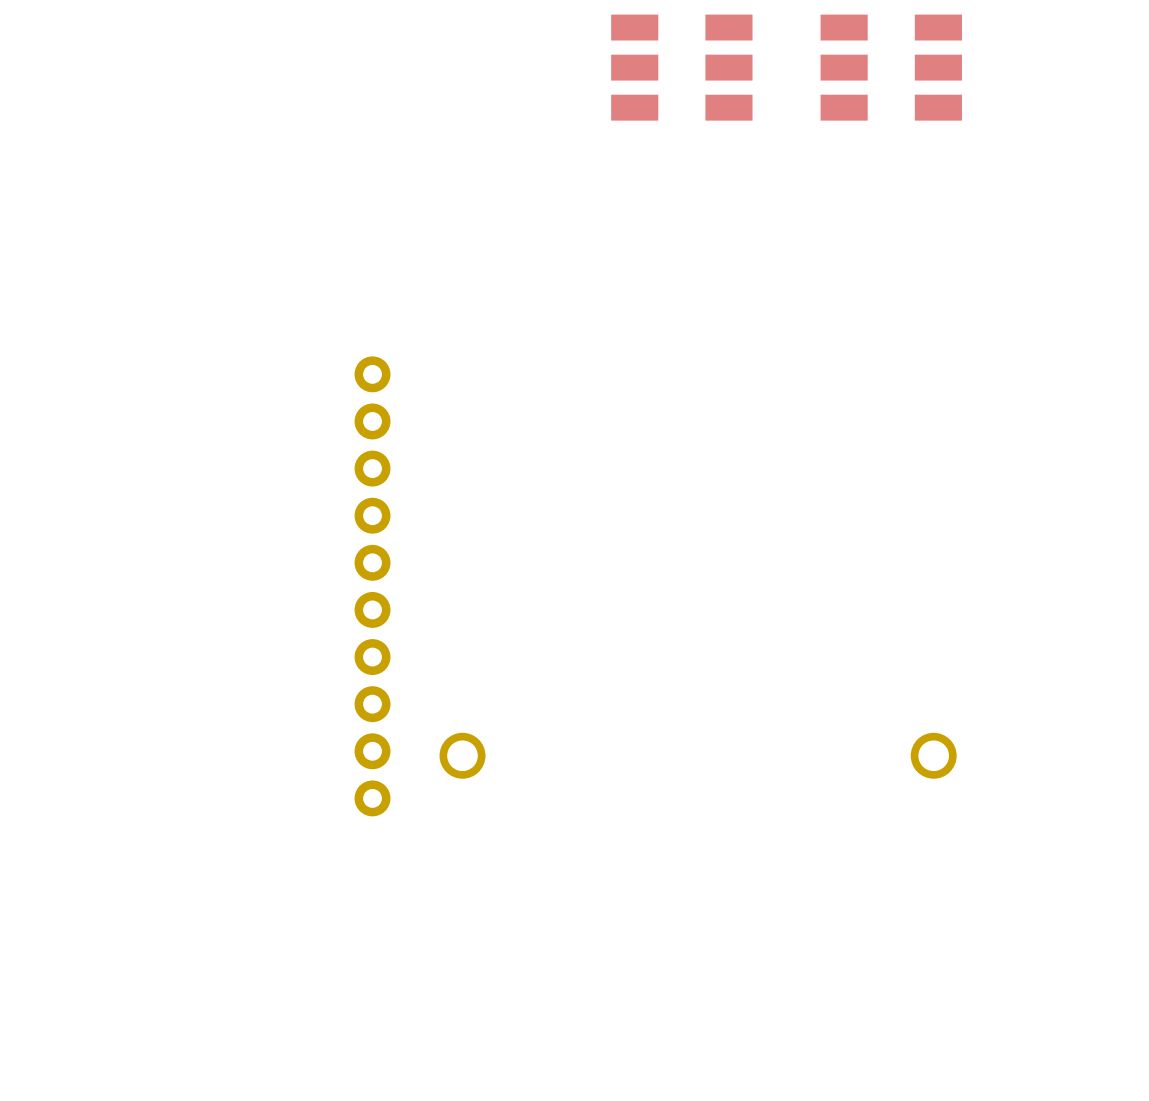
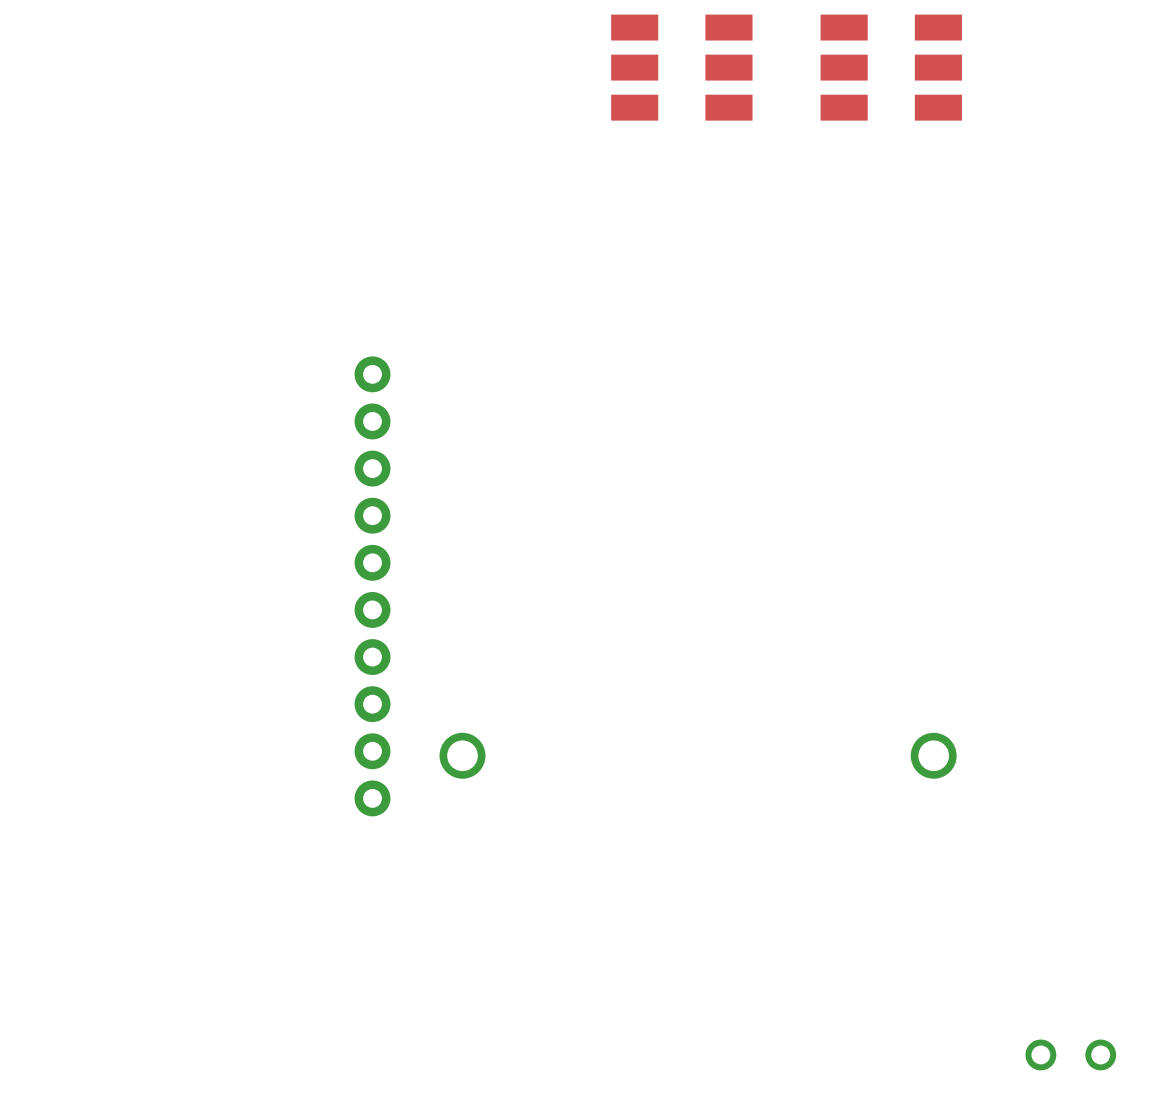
part: none -> (1070, 1054)

